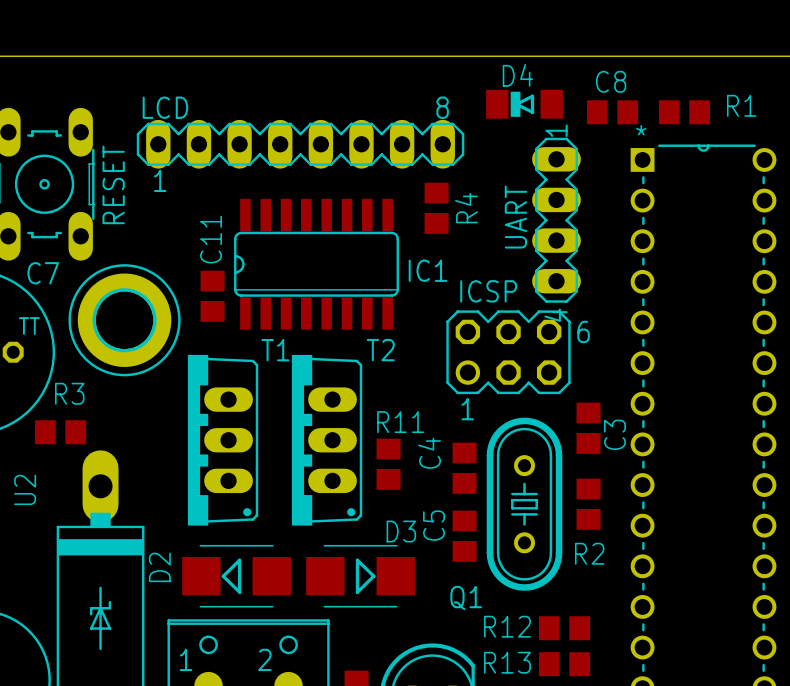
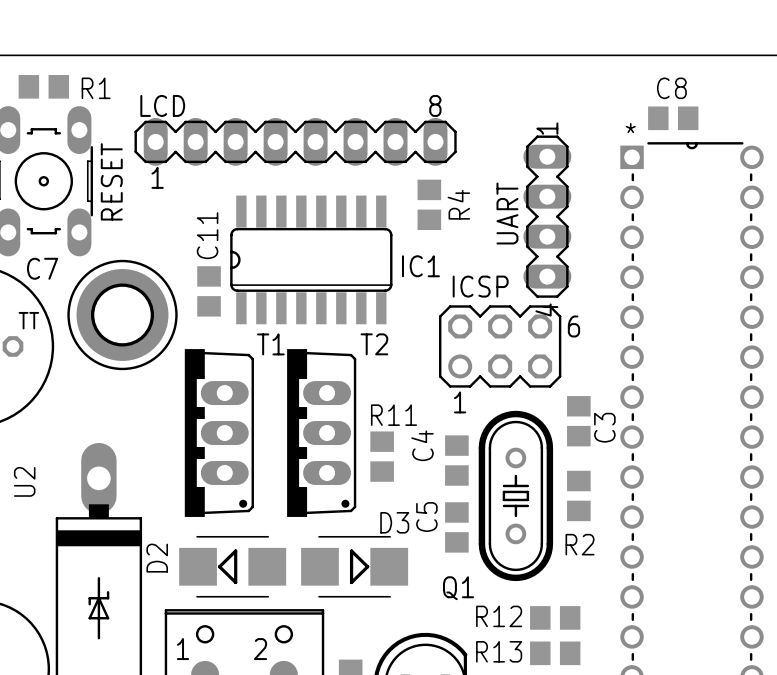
D4: (524, 104) -> none
R1 name position: R1 (741, 105) -> R1 (96, 88)
C8 position: (612, 112) -> (673, 118)
R1 position: (684, 112) -> (43, 86)
R3: (60, 432) -> none

